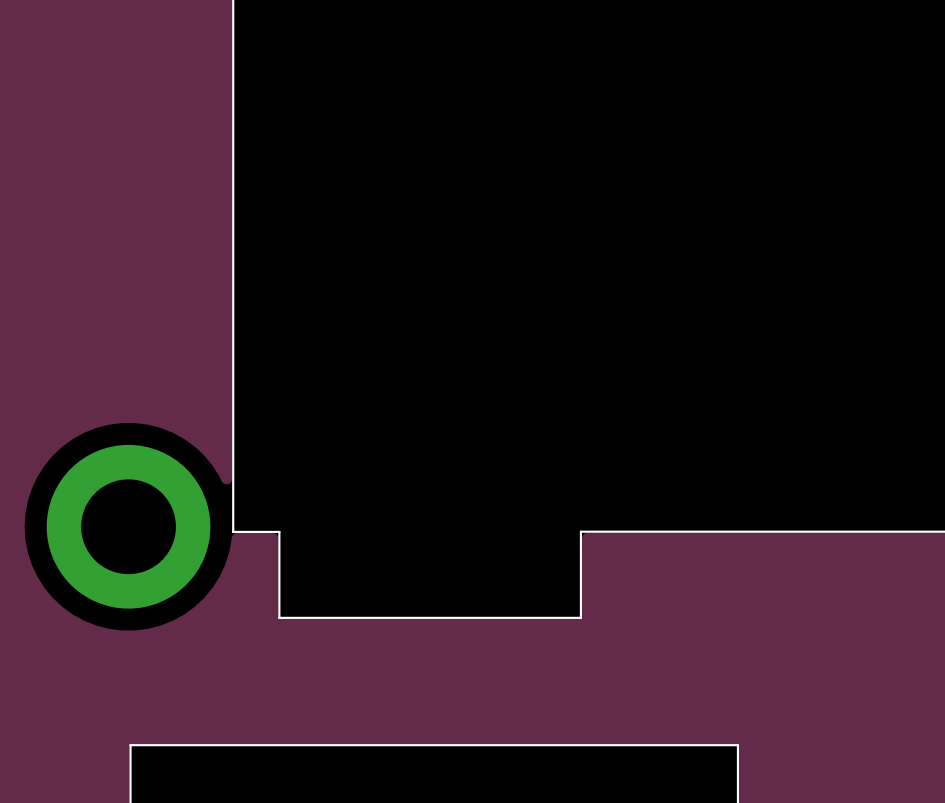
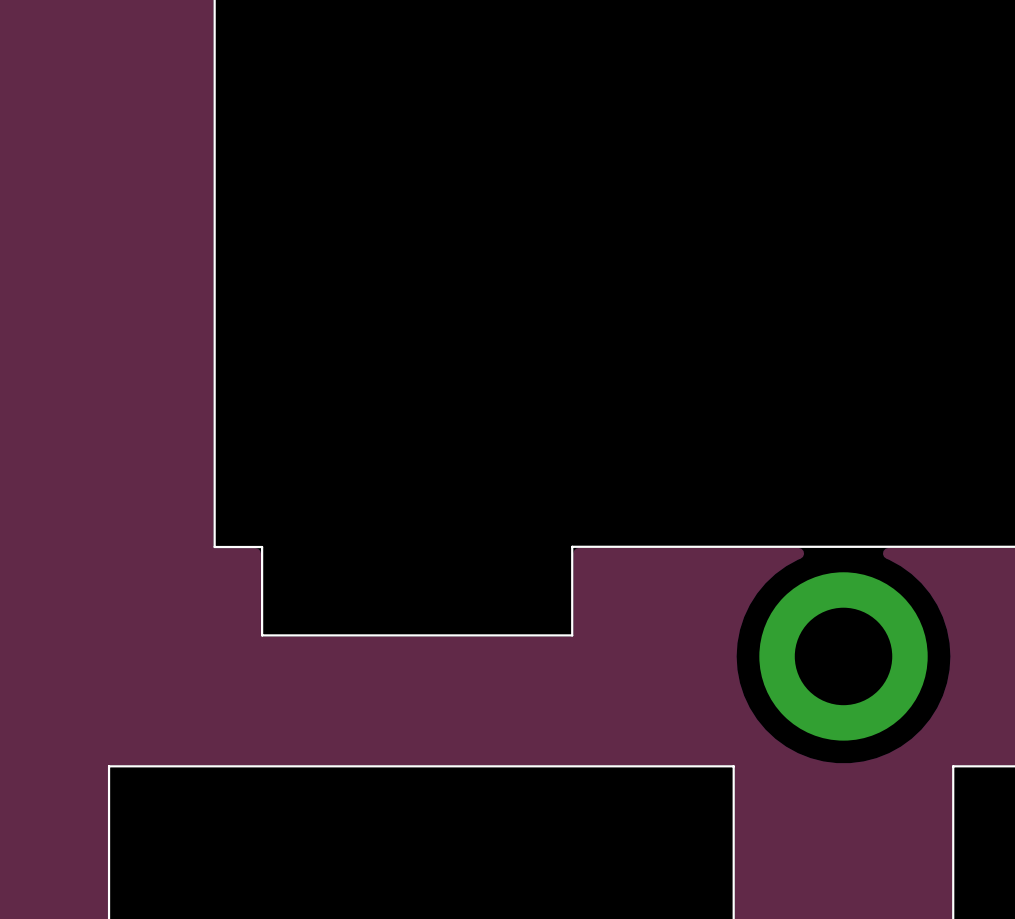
part position: (128, 526) -> (843, 656)

